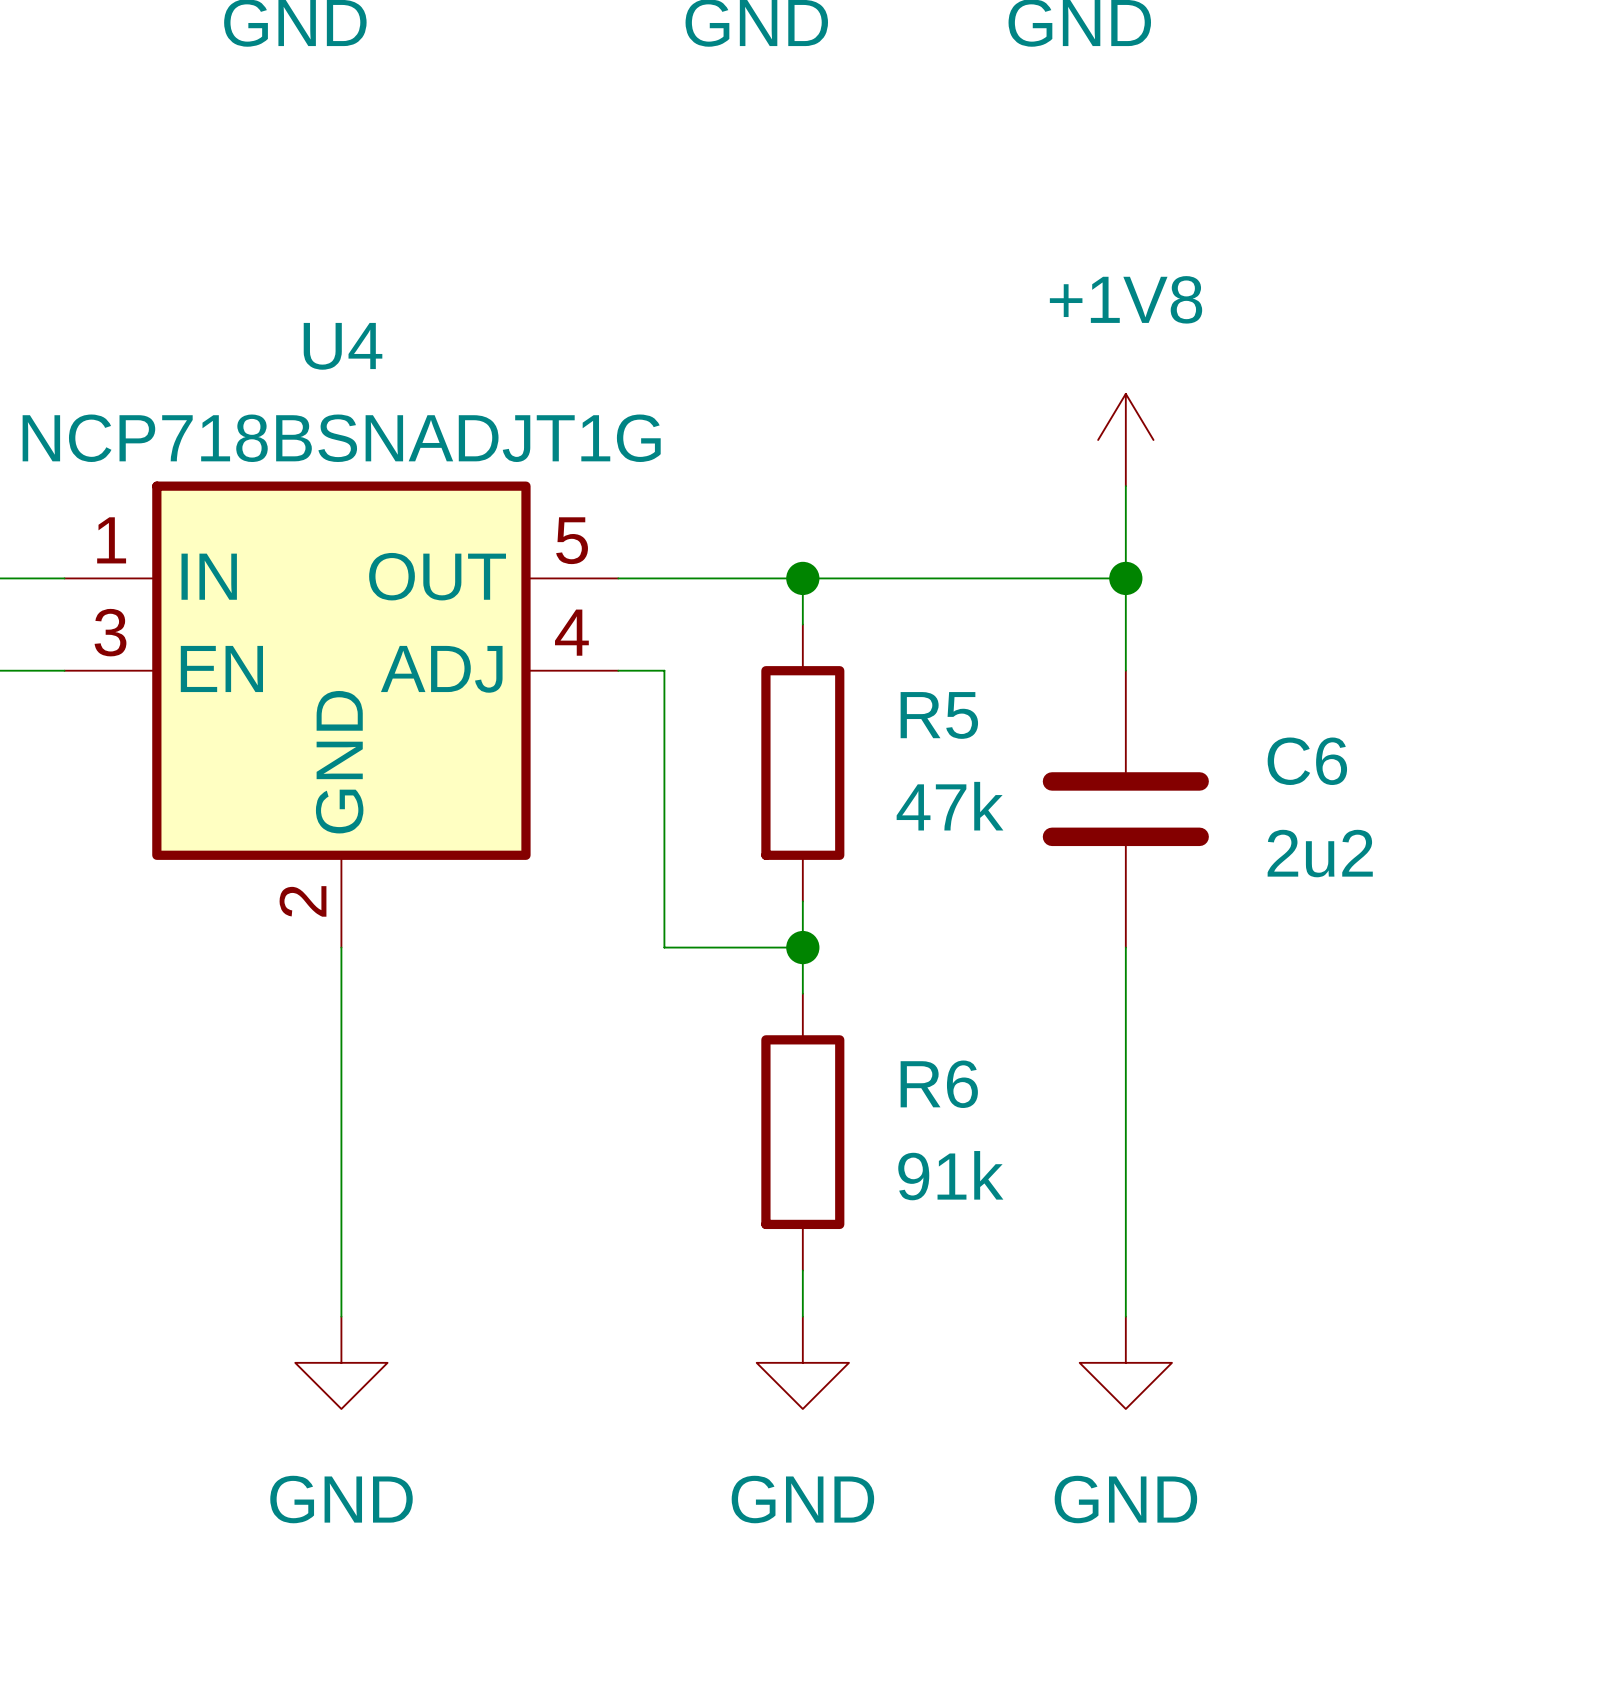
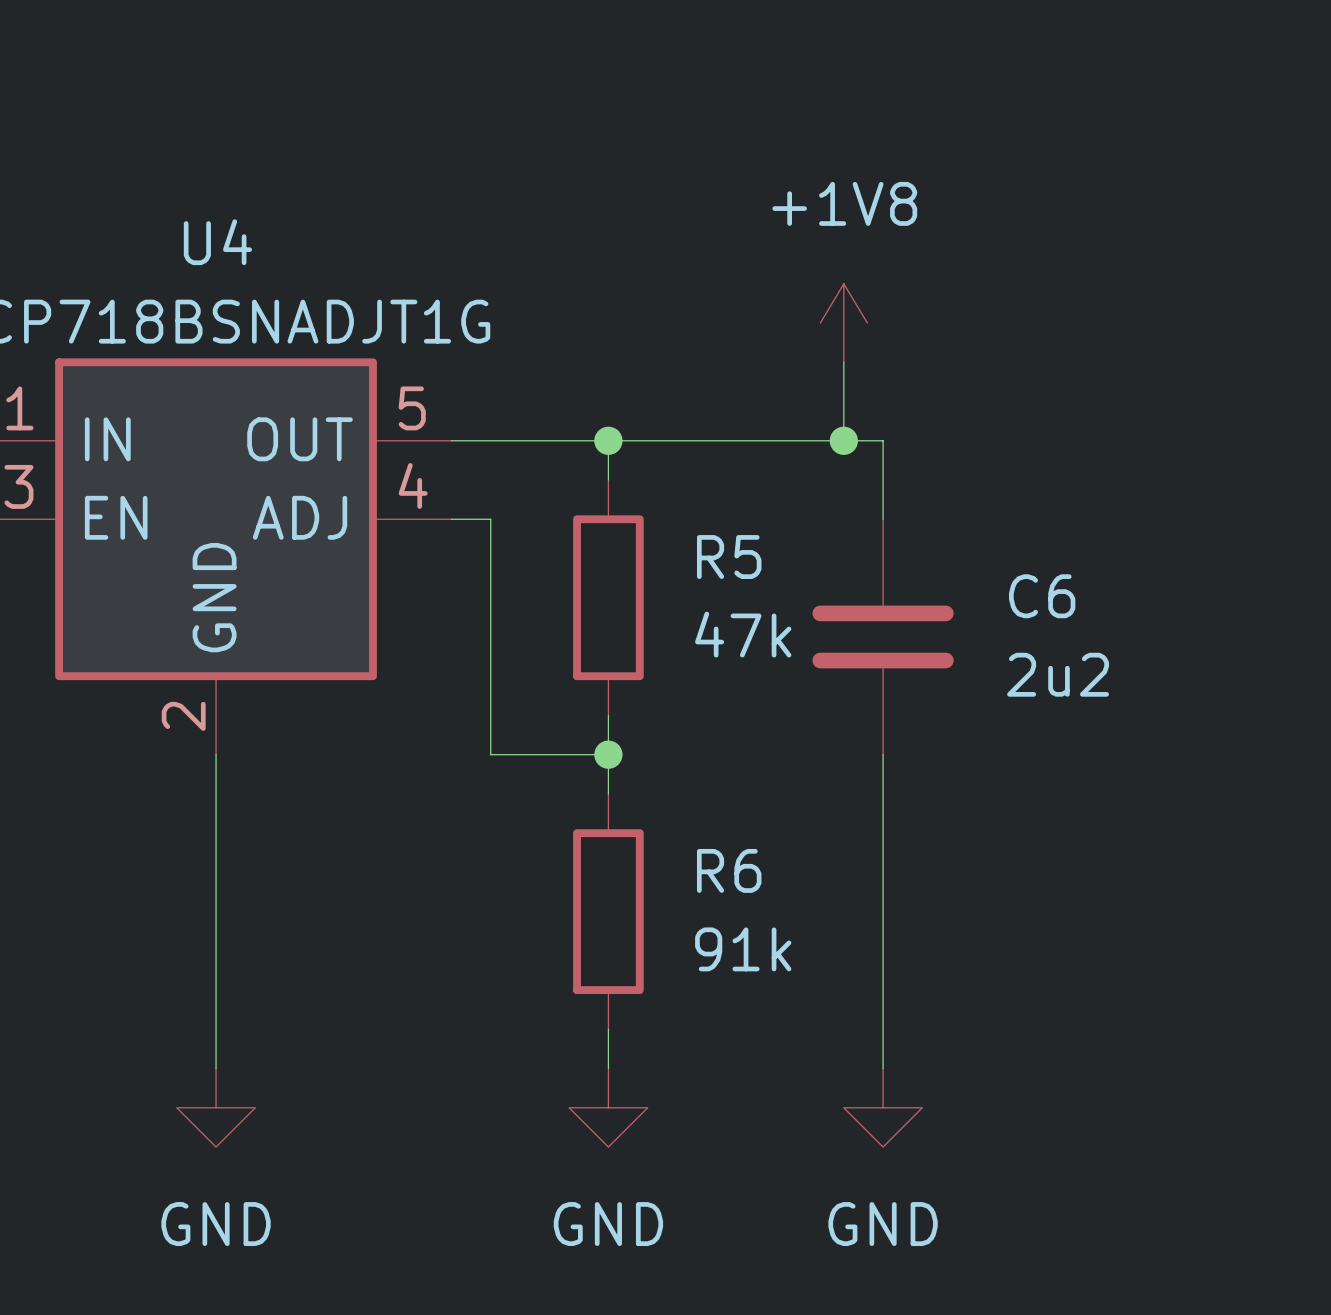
power symbol position: +1V8 (1125, 440) -> +1V8 (843, 323)
wire: (1125, 486) (1125, 578) -> (843, 362) (843, 440)
junction position: (1125, 578) -> (843, 440)

